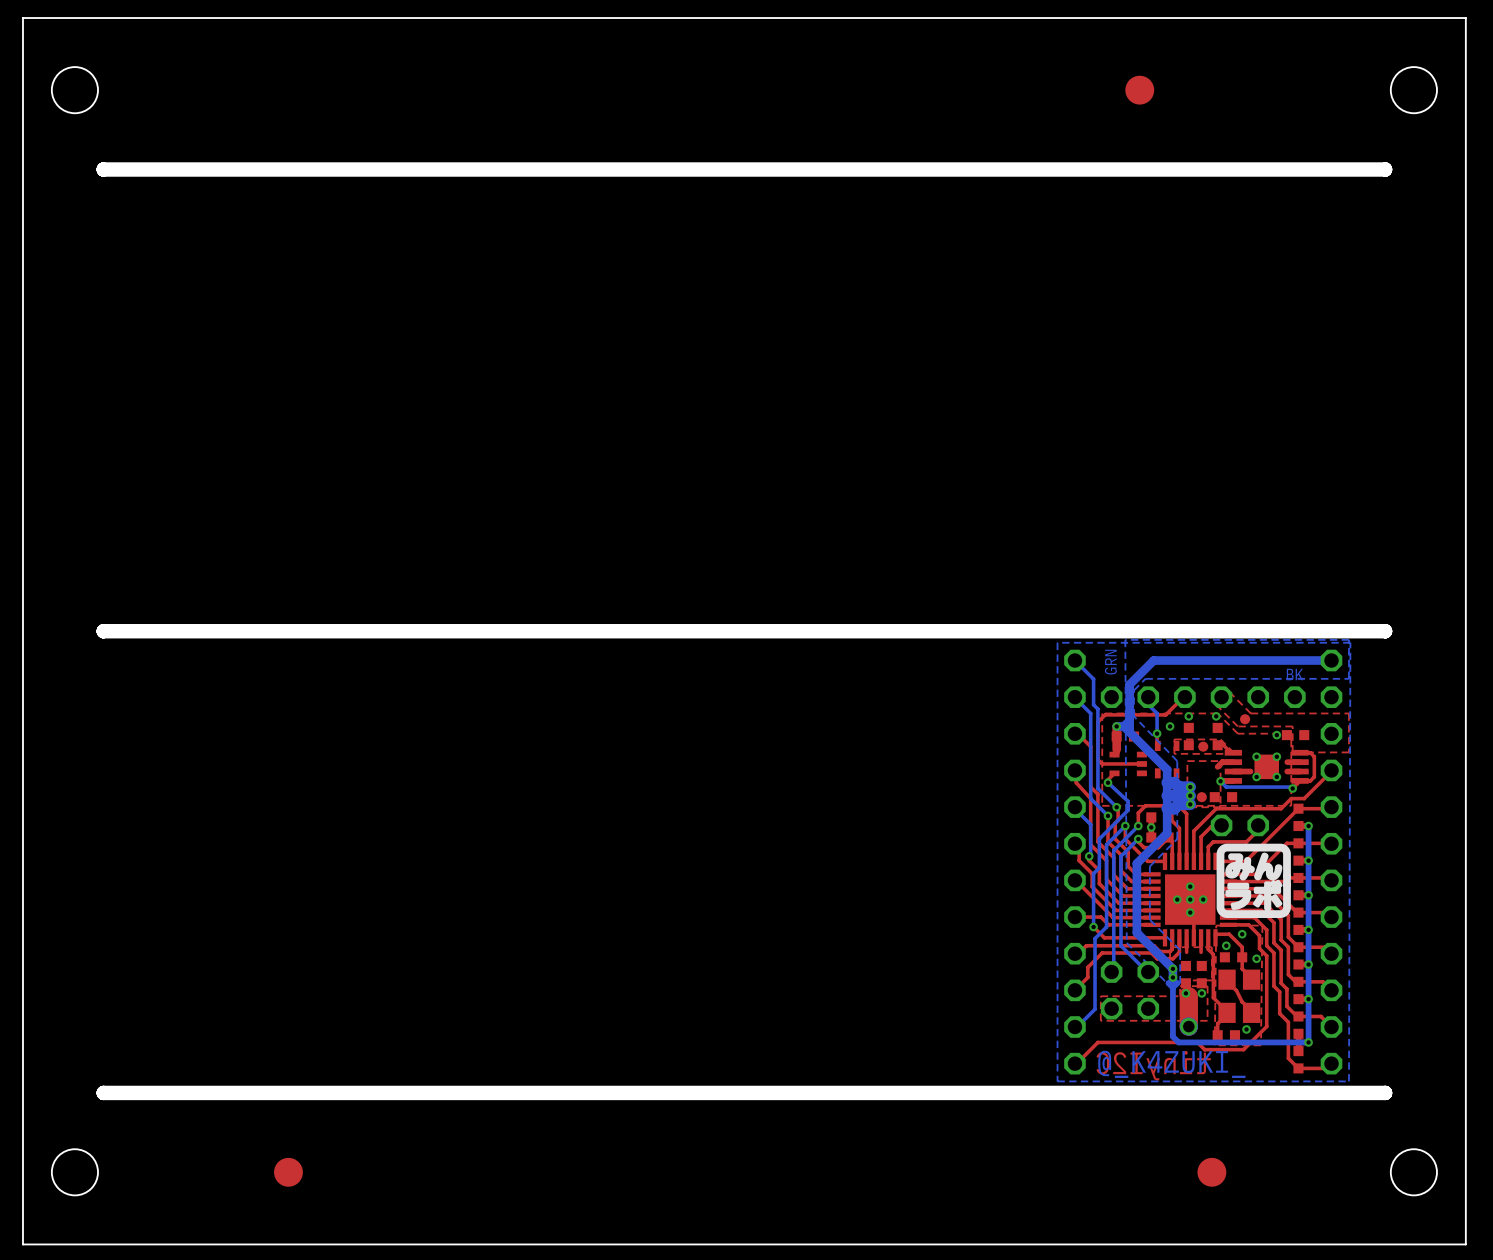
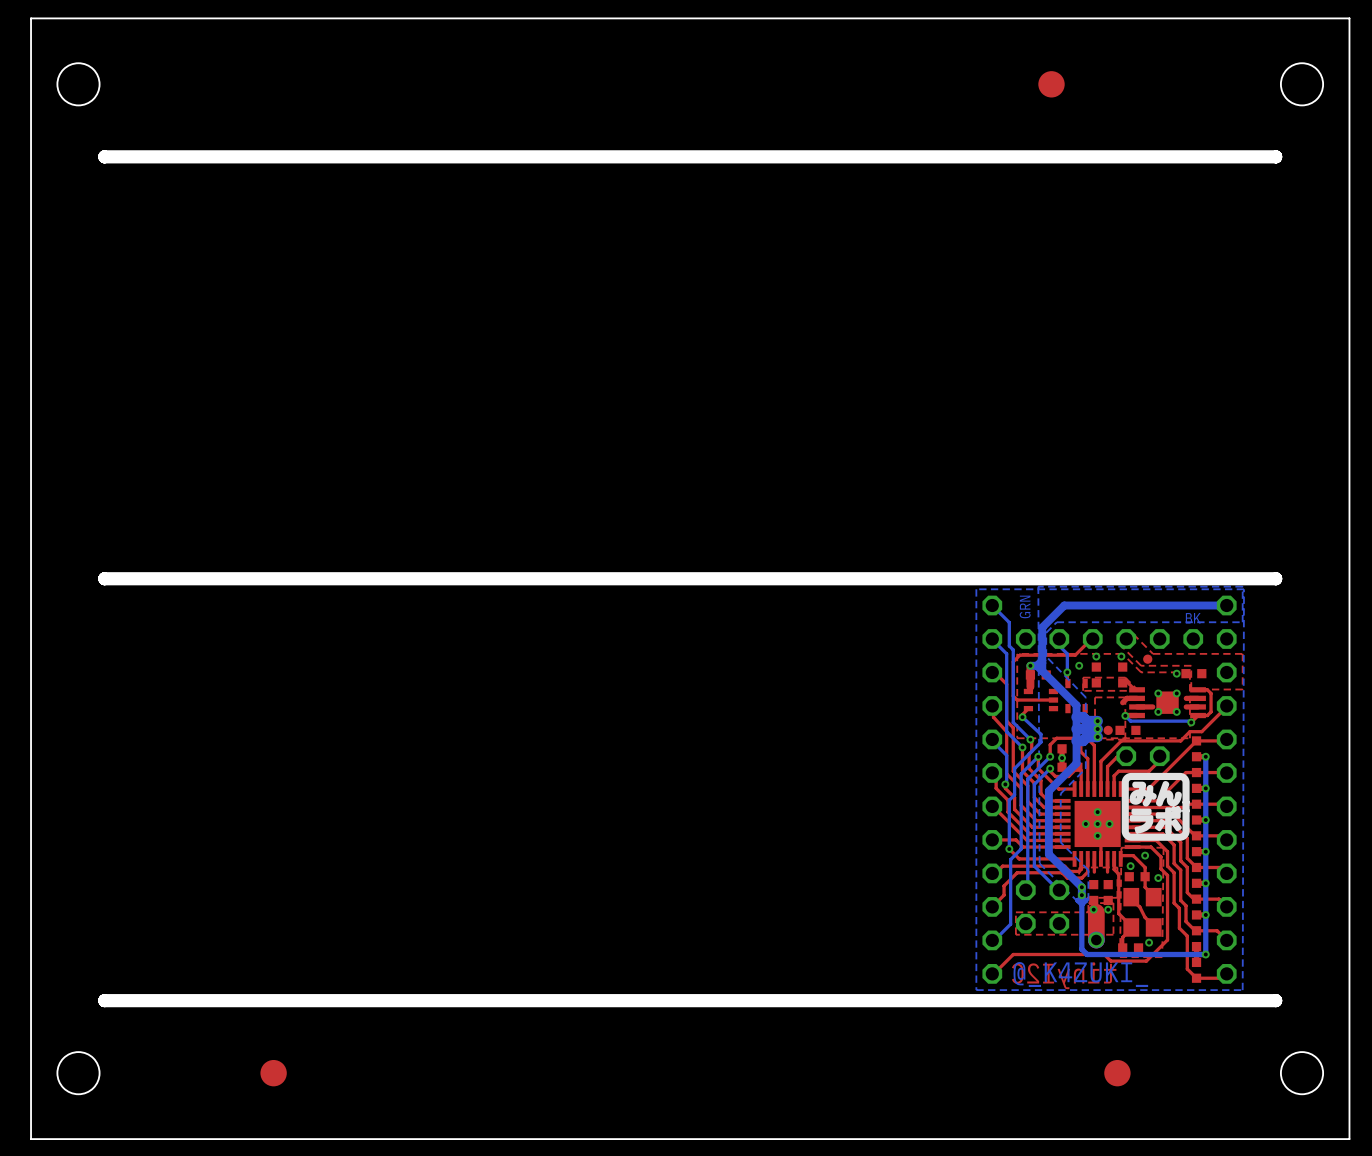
part: (1203, 746) -> none

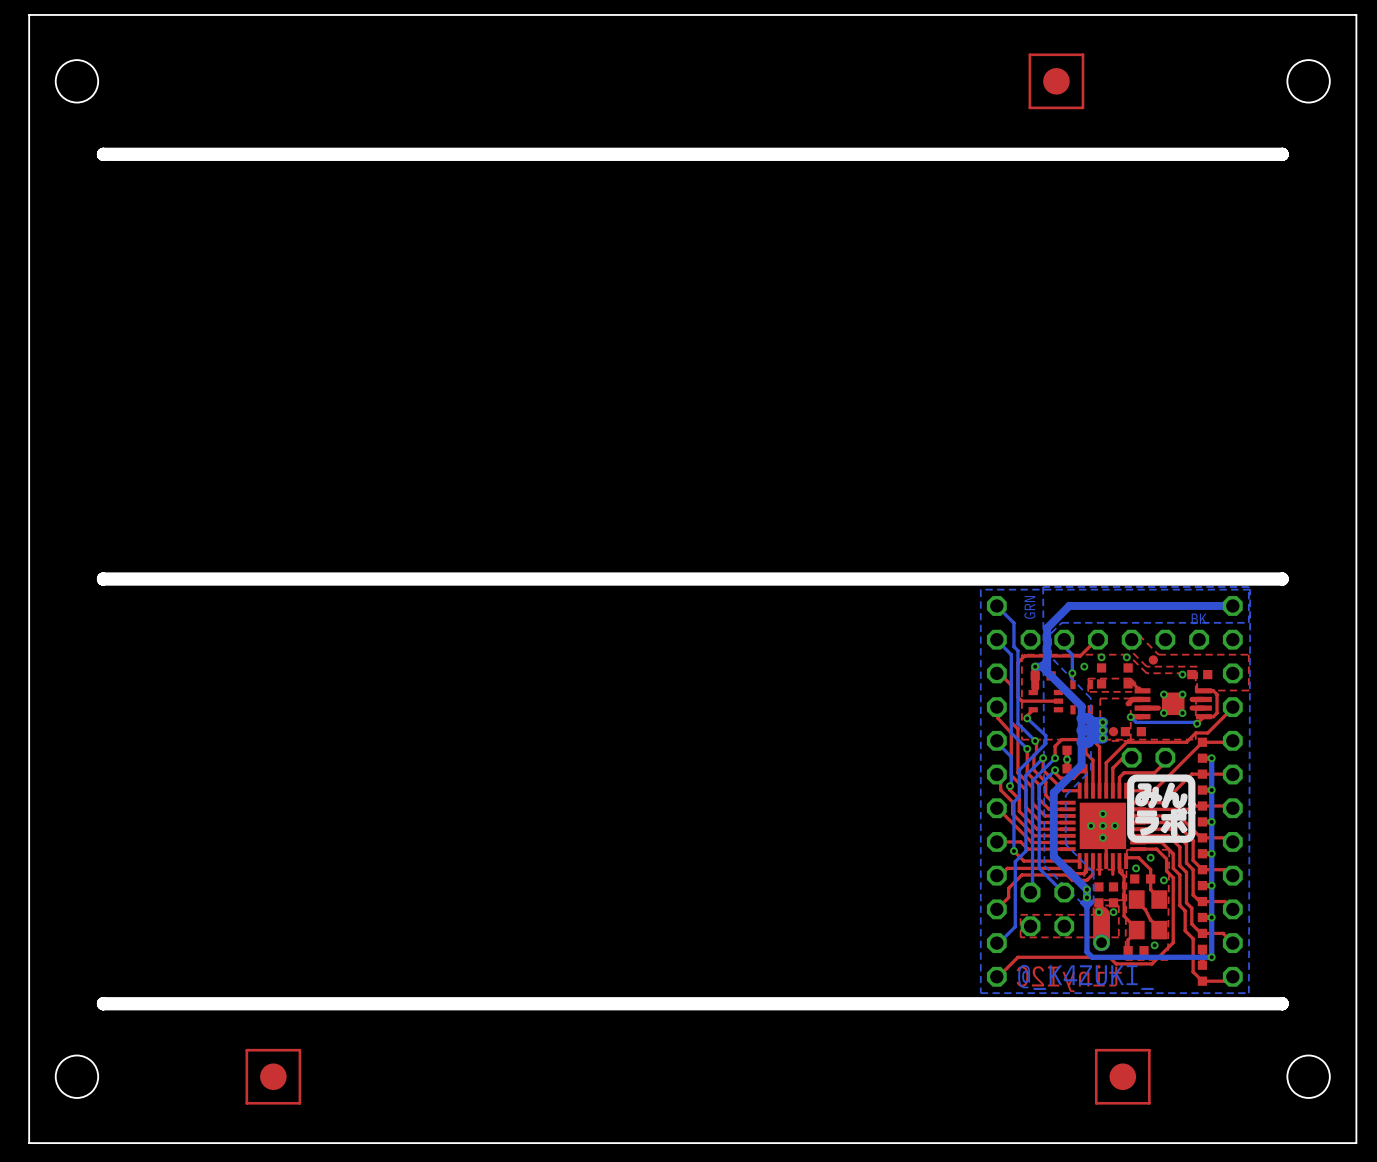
part footprint: [1038, 71, 1065, 98] -> [1028, 53, 1085, 110]
part footprint: [260, 1059, 287, 1087] -> [245, 1048, 302, 1105]
part footprint: [1104, 1059, 1131, 1087] -> [1094, 1048, 1151, 1105]

